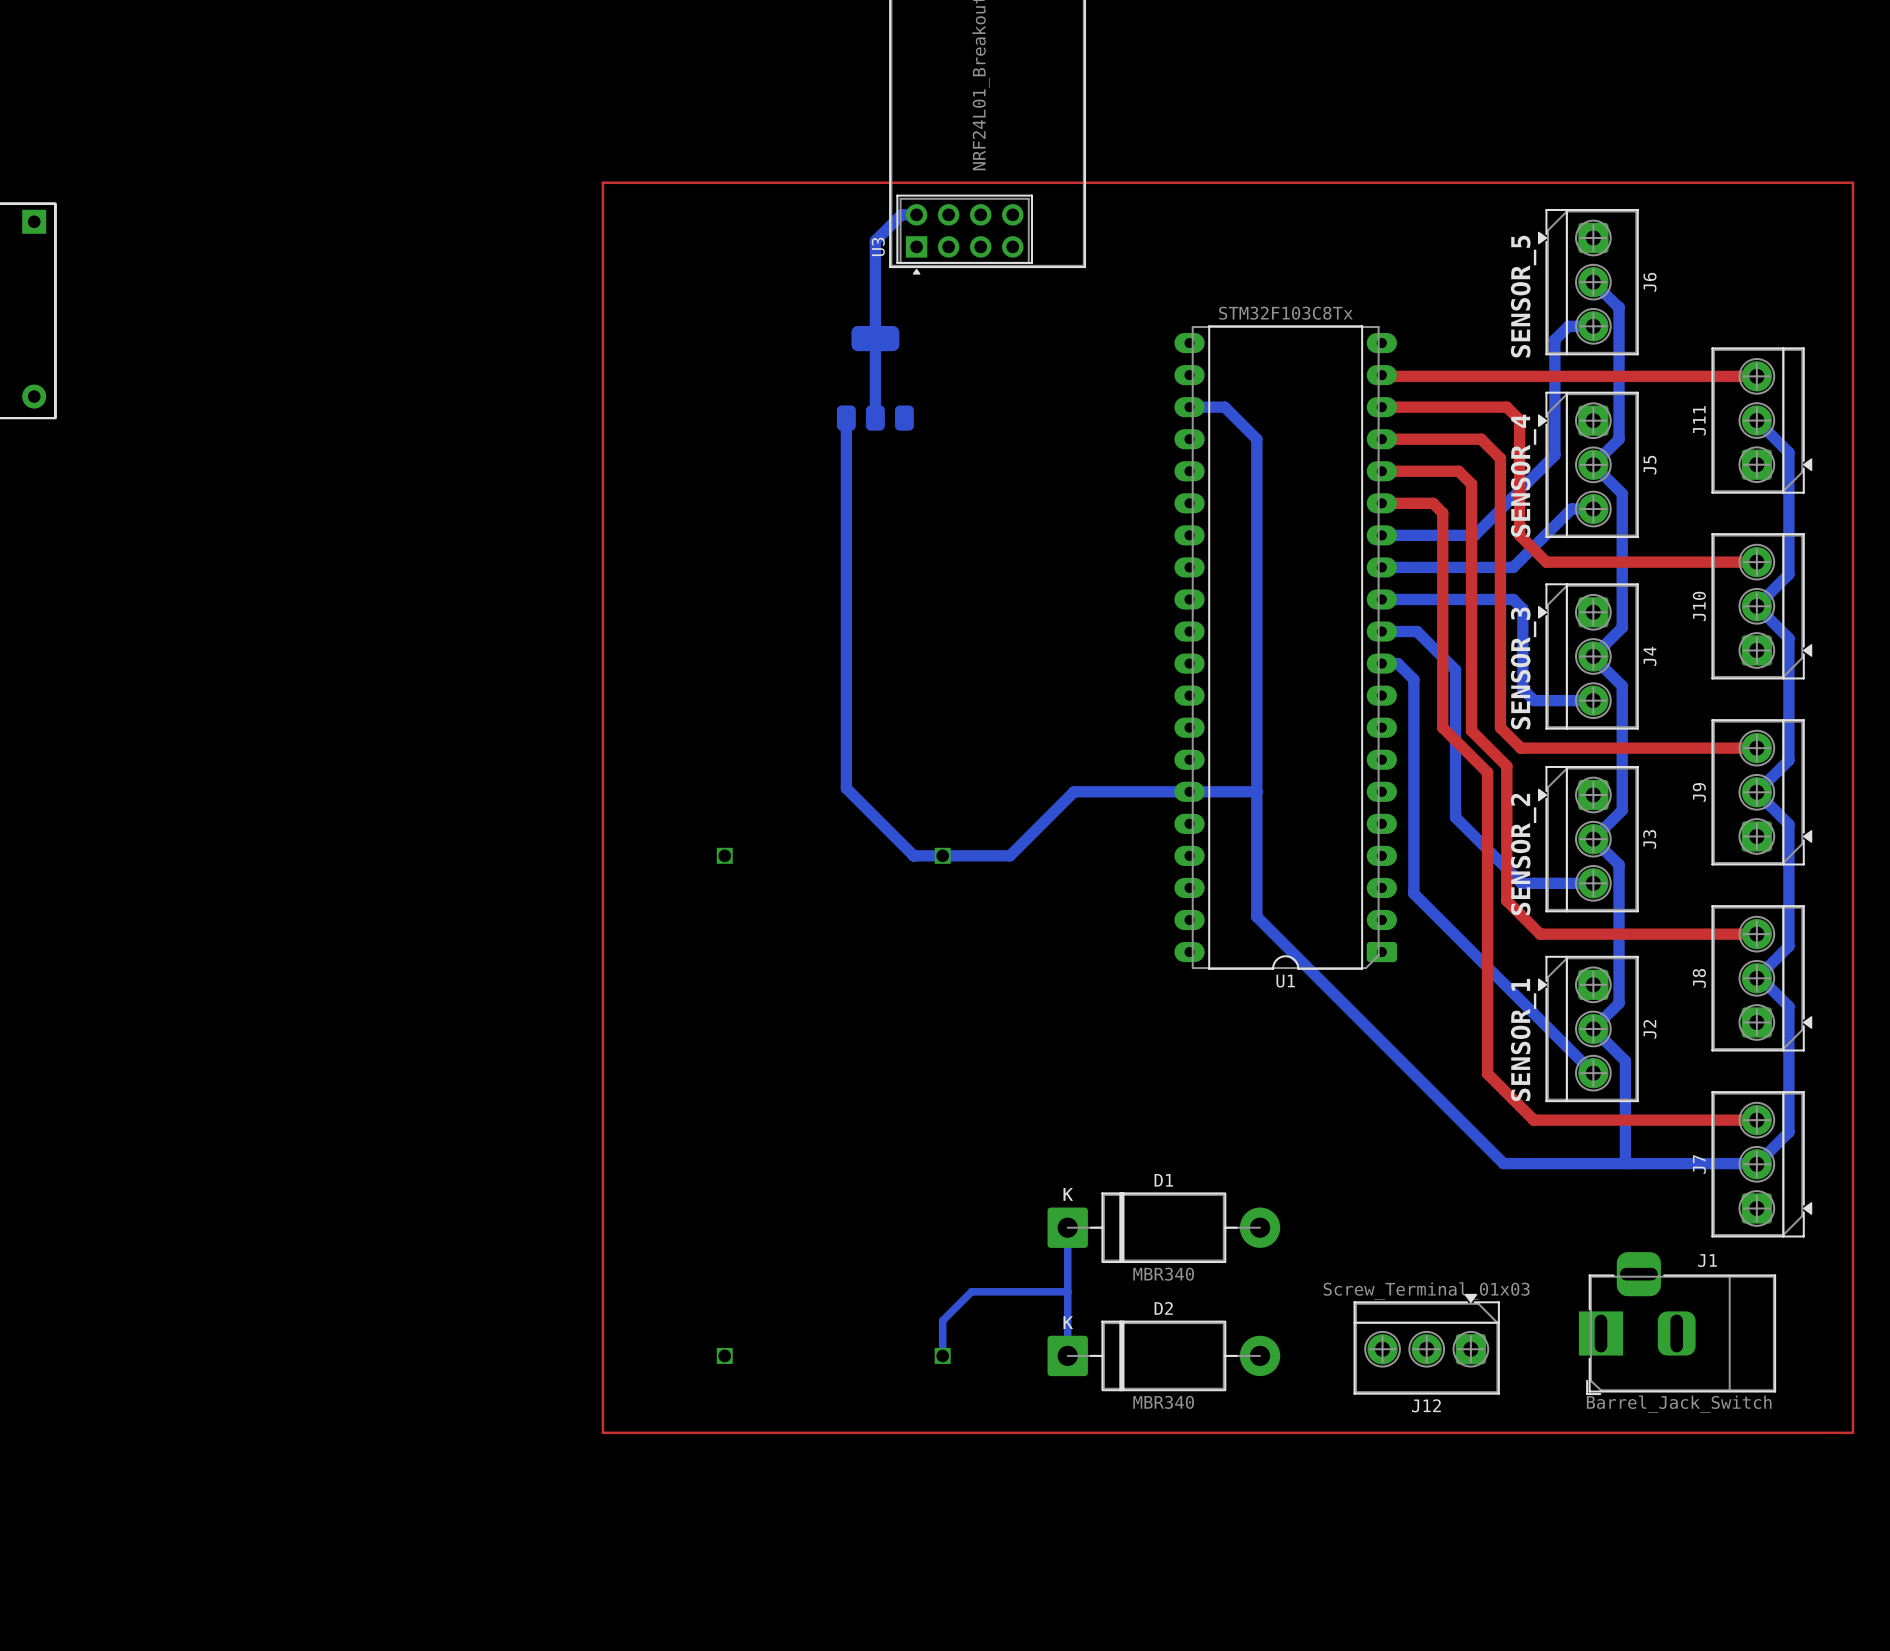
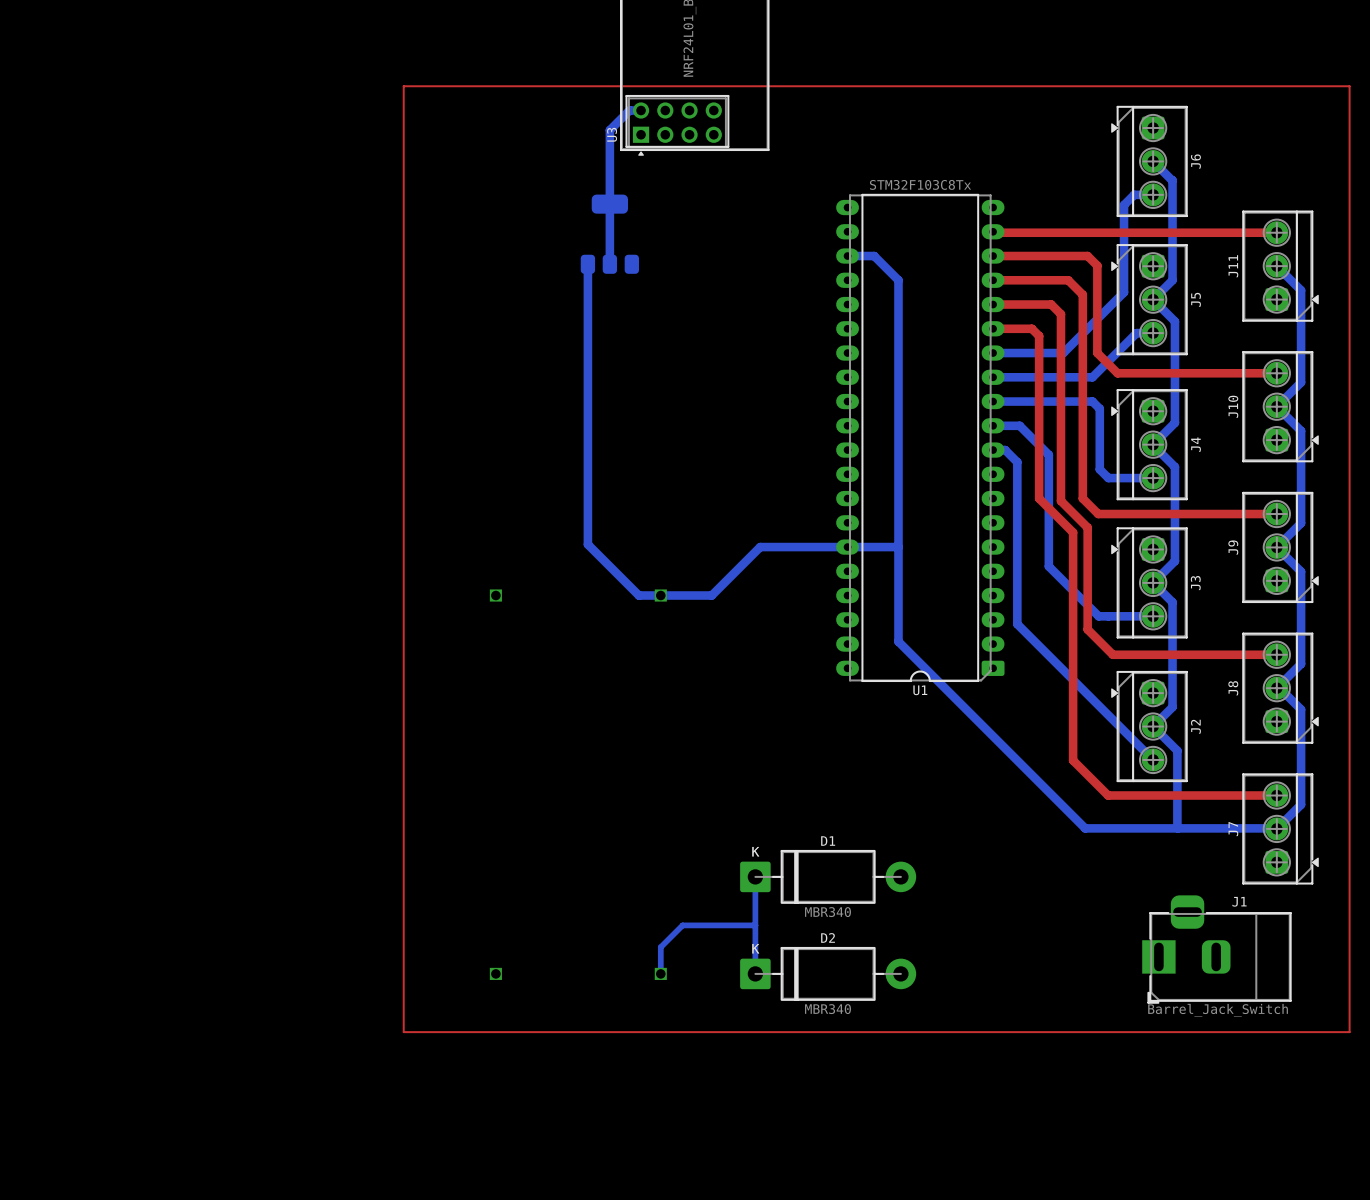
text: SENSOR_5 (1523, 296) -> none
text: SENSOR_4 (1523, 475) -> none
text: SENSOR_3 (1523, 668) -> none
text: SENSOR_2 (1523, 854) -> none
text: SENSOR_1 (1523, 1039) -> none
J12: Screw_Terminal_01x03 (1426, 1344) -> none

